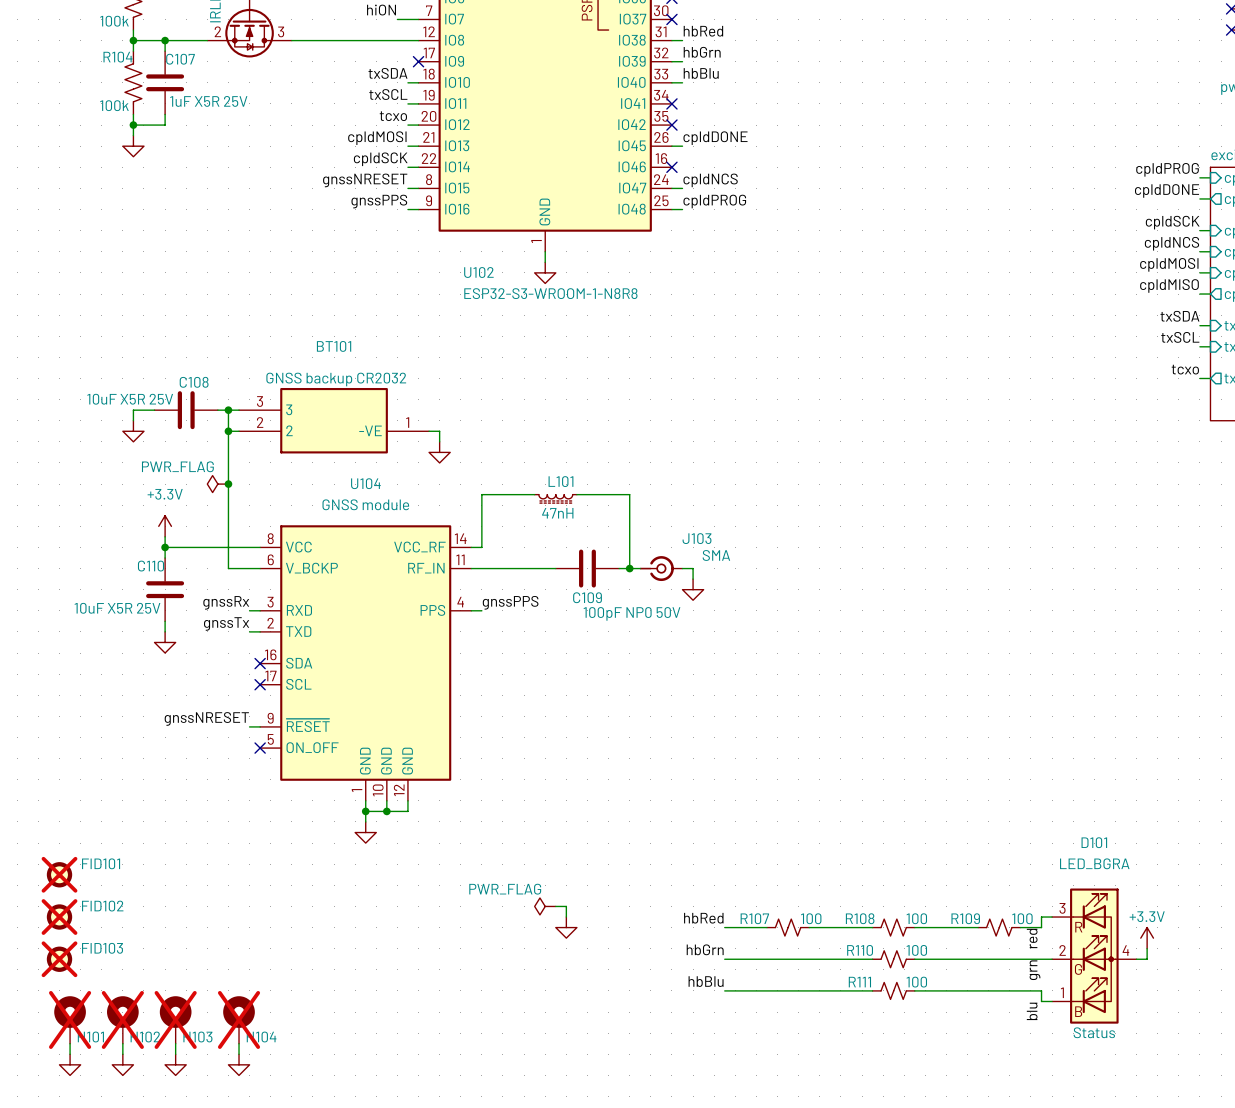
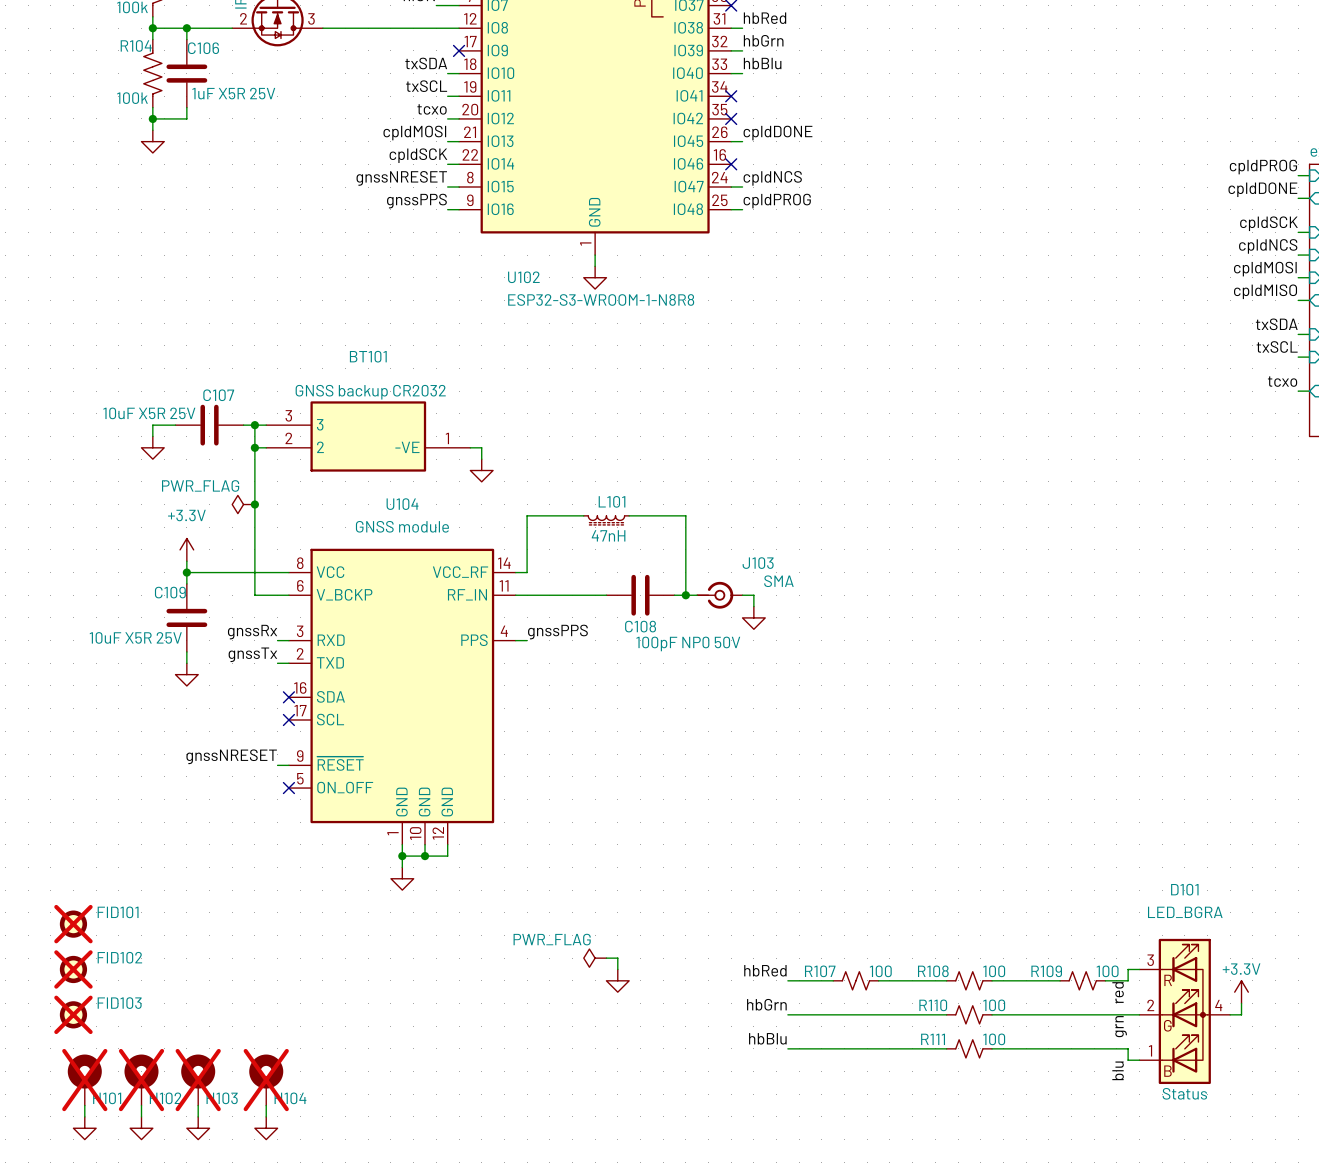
C107 name: C107 (180, 59) -> C106 (203, 48)
C108 name: C108 (194, 382) -> C107 (218, 395)
C110 name: C110 (150, 566) -> C109 (170, 592)
C109 name: C109 (587, 597) -> C108 (640, 626)

